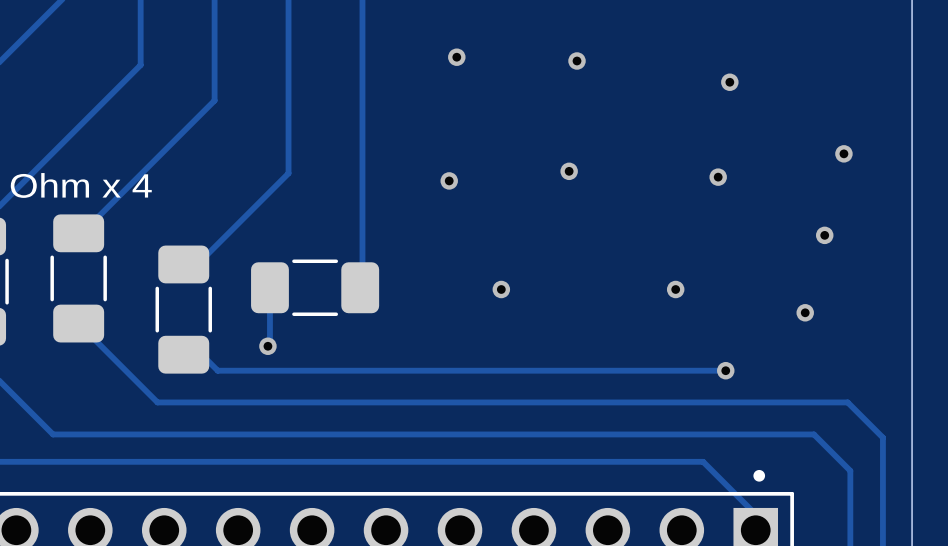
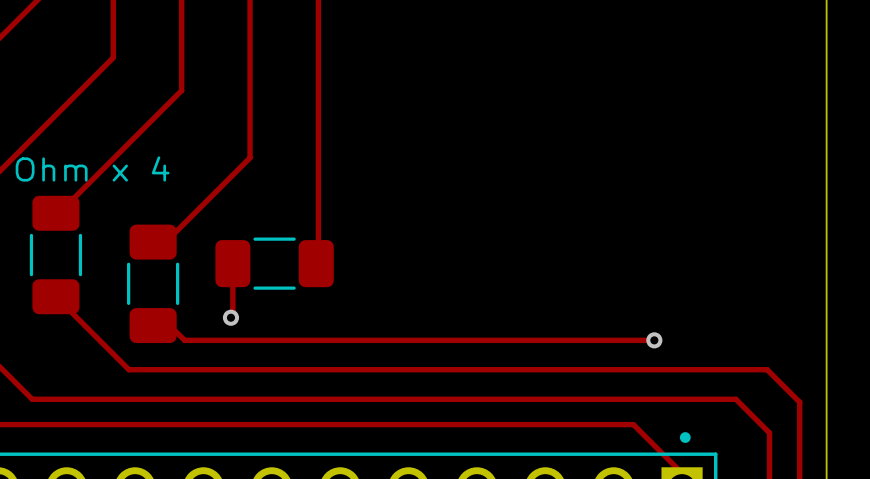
via: (456, 57) -> none
via: (577, 60) -> none
via: (729, 82) -> none
via: (843, 153) -> none
via: (569, 171) -> none
via: (718, 177) -> none
via: (449, 180) -> none
via: (824, 235) -> none
via: (501, 289) -> none
via: (675, 289) -> none
via: (805, 312) -> none

